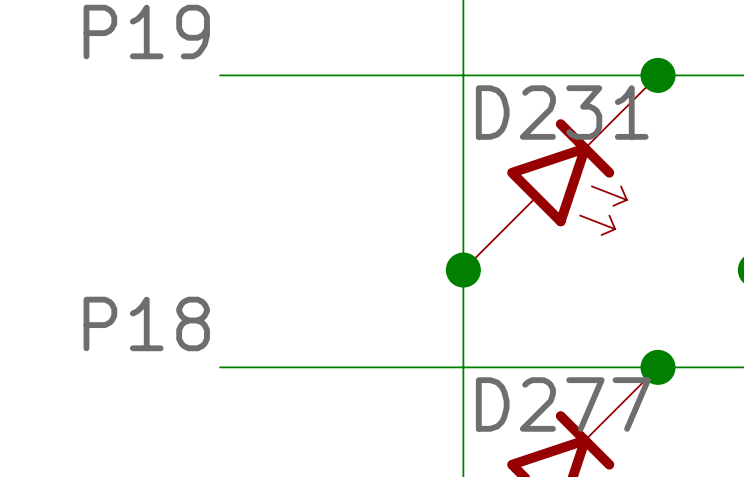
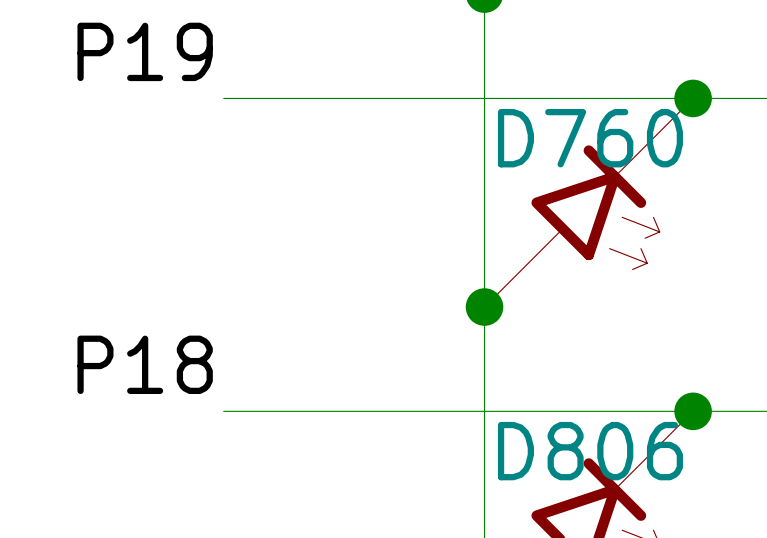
D231 name: D231 (562, 112) -> D760 (590, 138)
D277 name: D277 (563, 404) -> D806 (590, 451)

